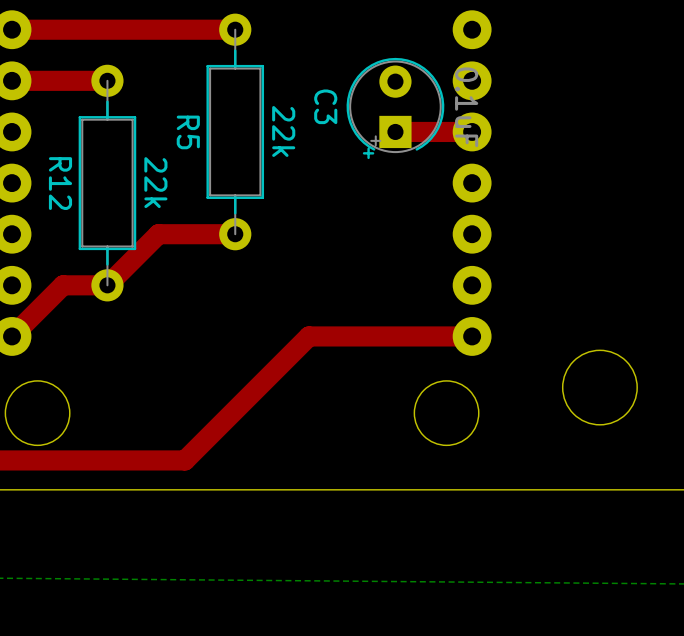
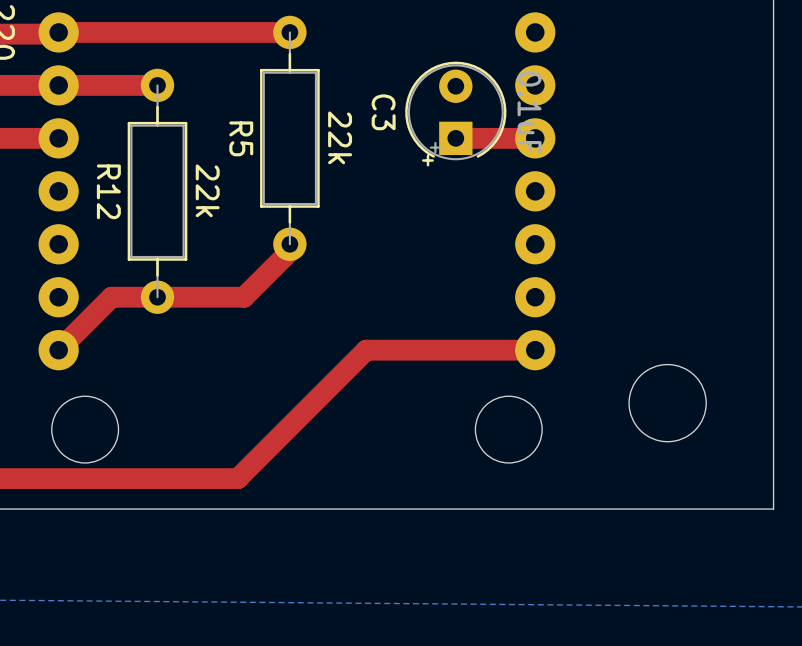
top track: (235, 234) (158, 234) (107, 285) -> (289, 244) (289, 251) (244, 297) (157, 297)

